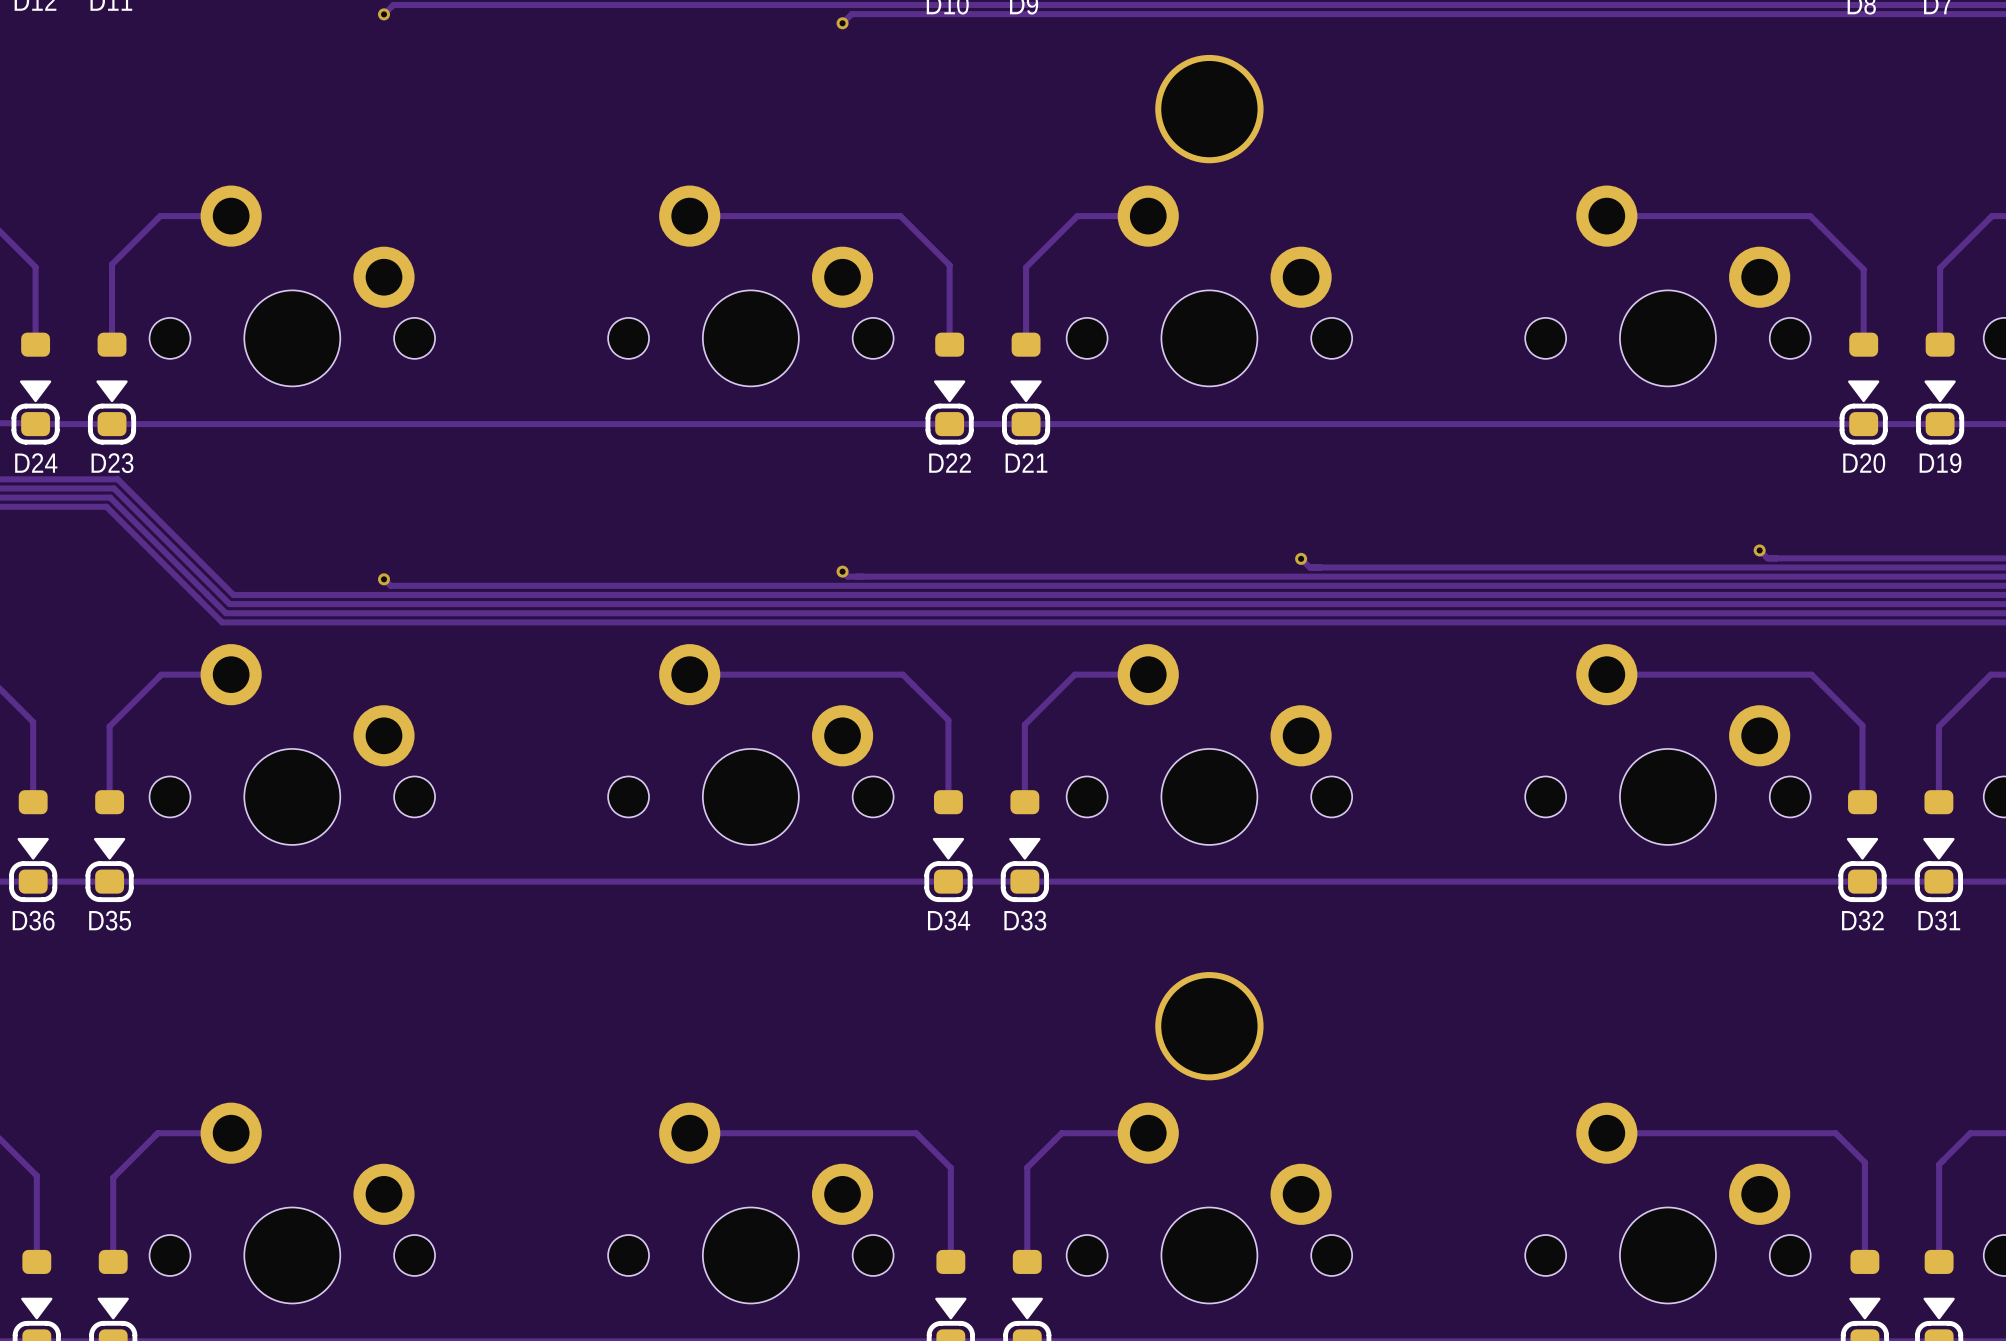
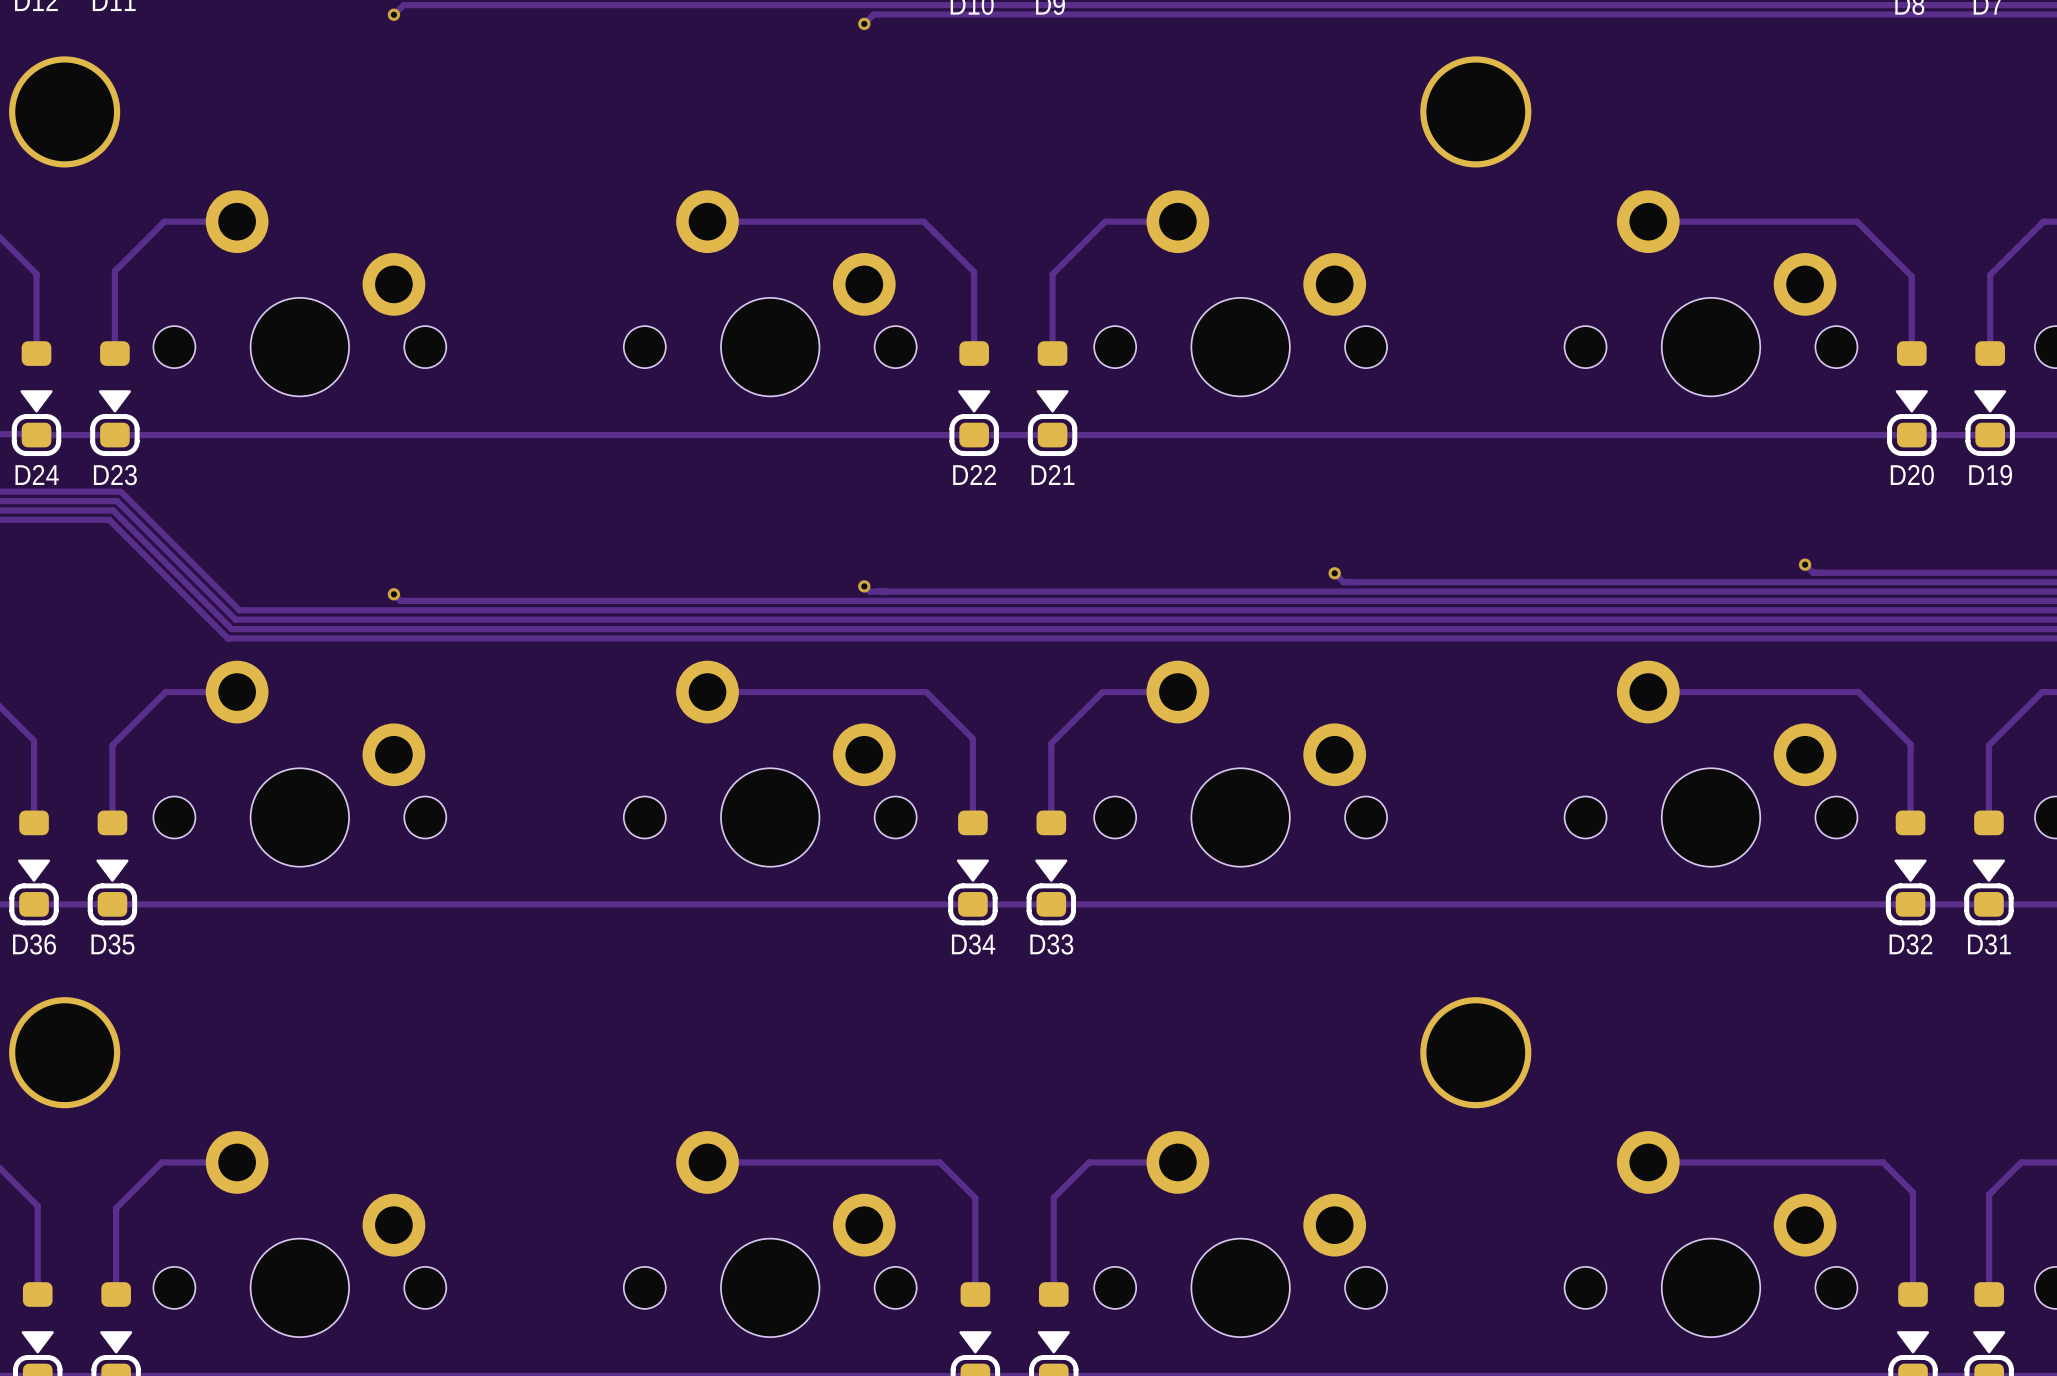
part: none -> (64, 111)
part position: (1209, 109) -> (1475, 111)
part: none -> (64, 1052)
part position: (1209, 1026) -> (1475, 1052)

